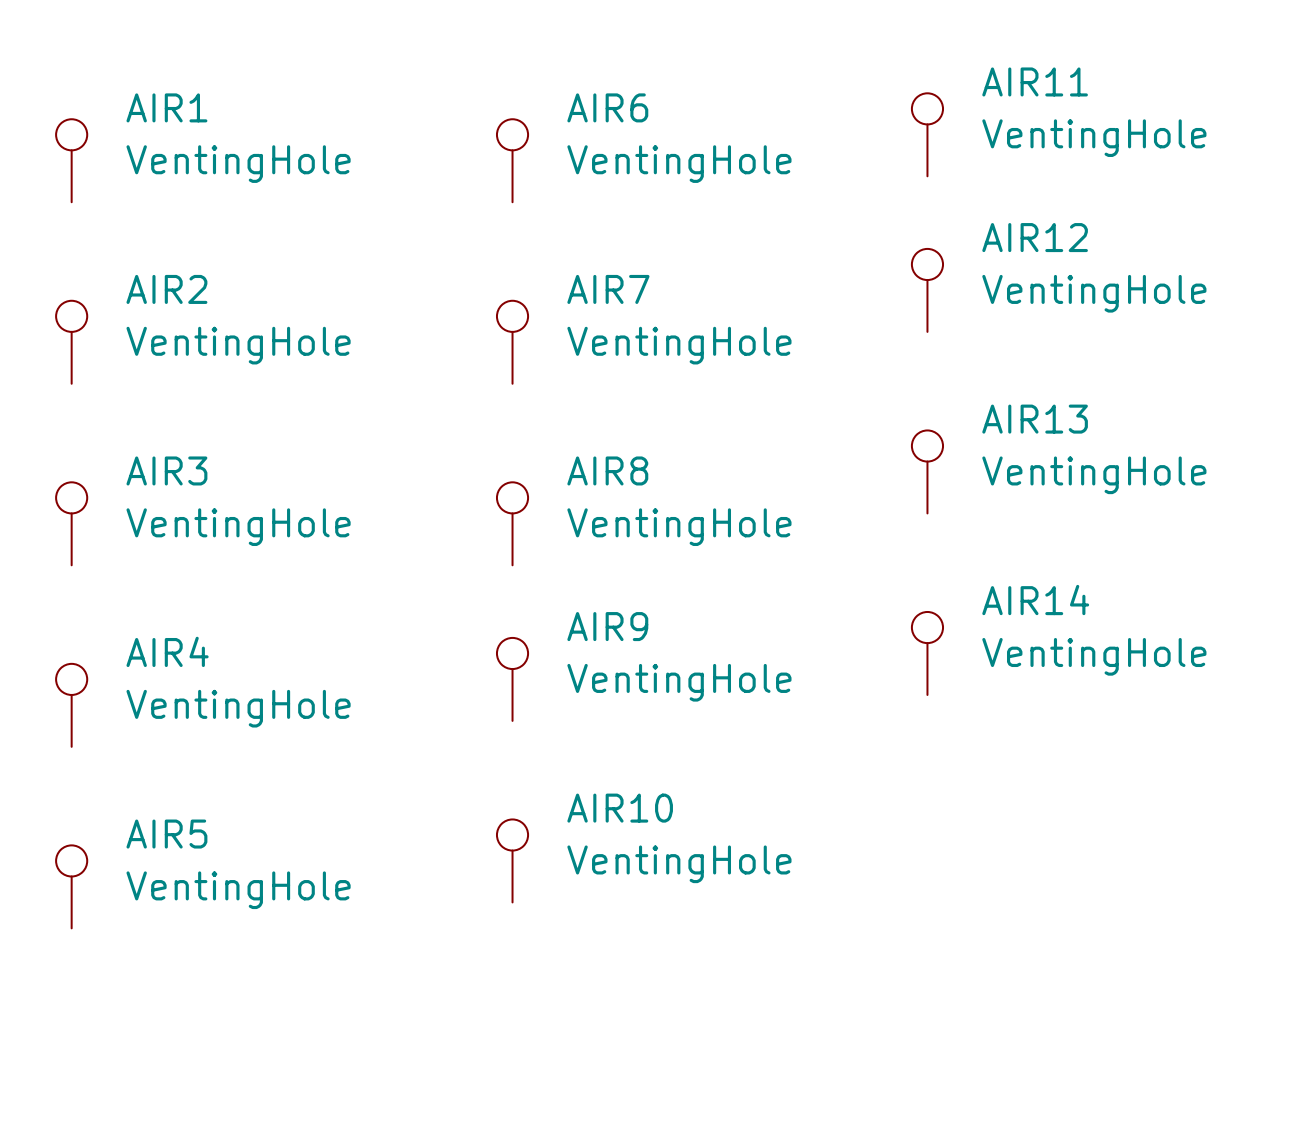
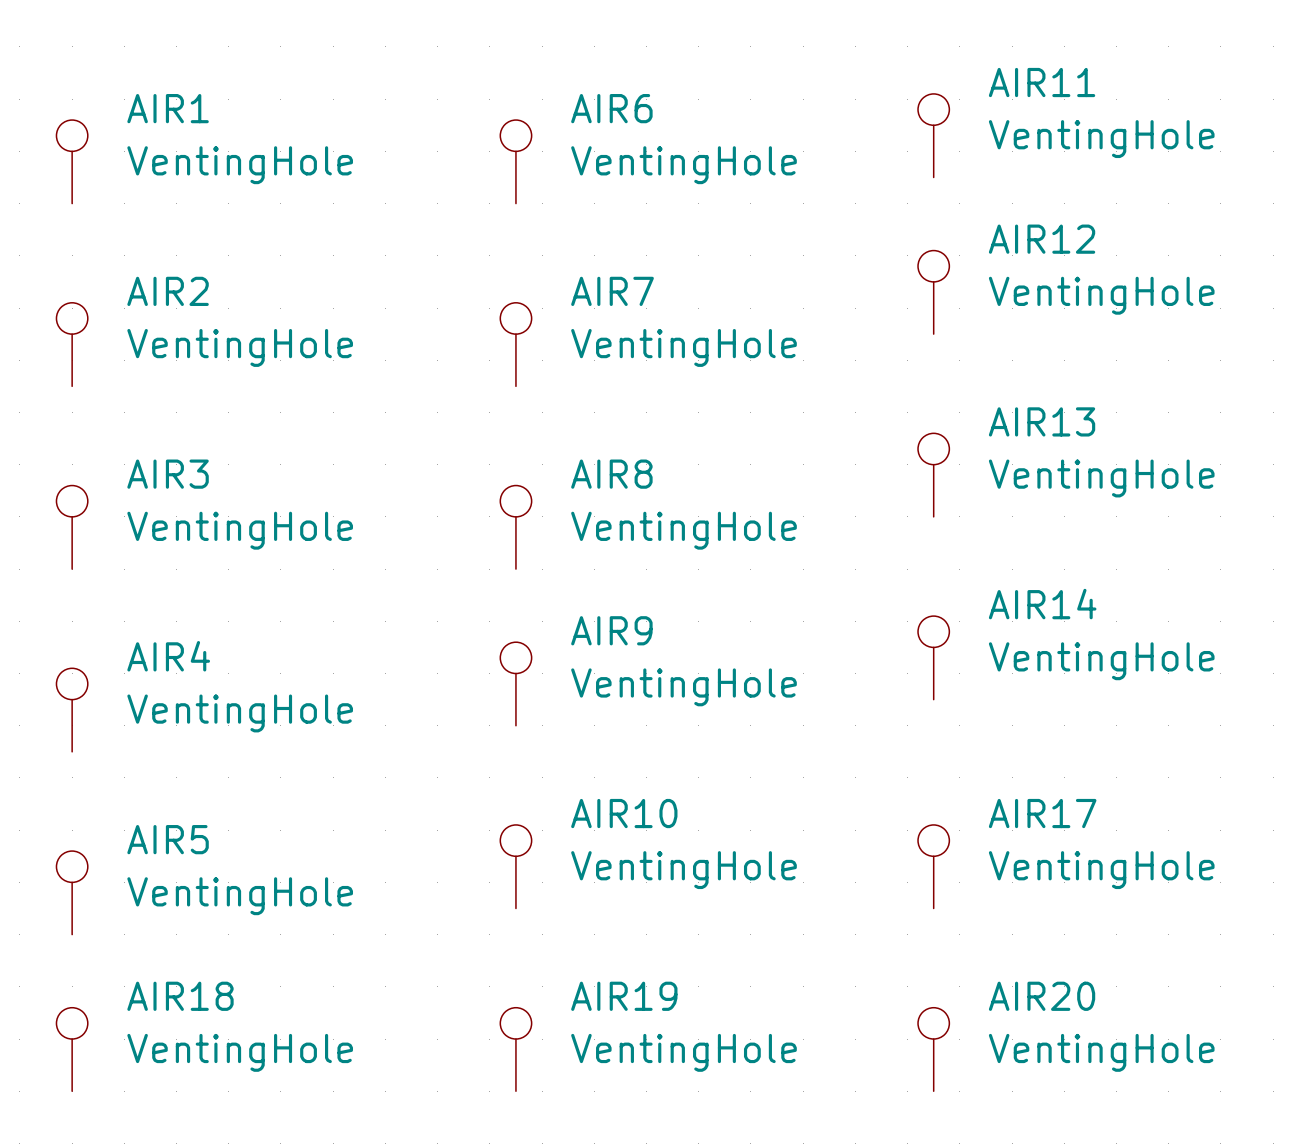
AIR17: none -> VentingHole (933, 866)
AIR18: none -> VentingHole (72, 1049)
AIR19: none -> VentingHole (515, 1049)
AIR20: none -> VentingHole (933, 1049)

